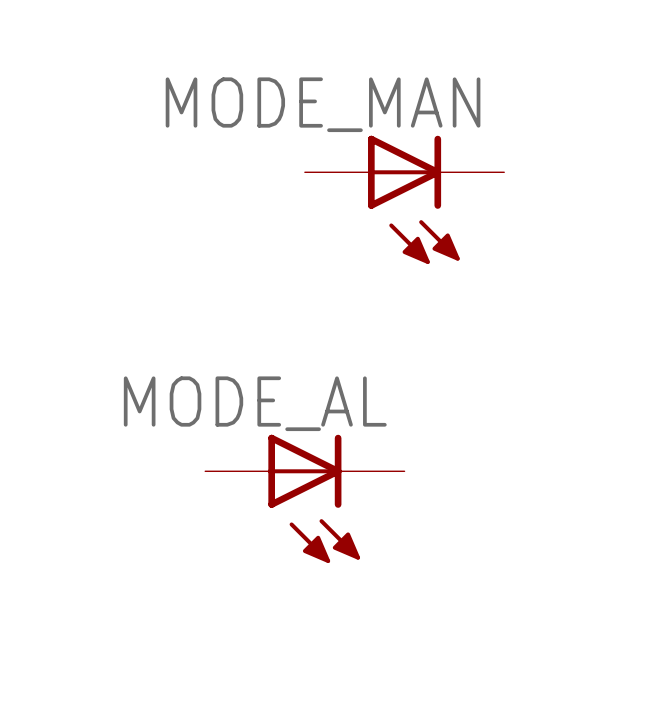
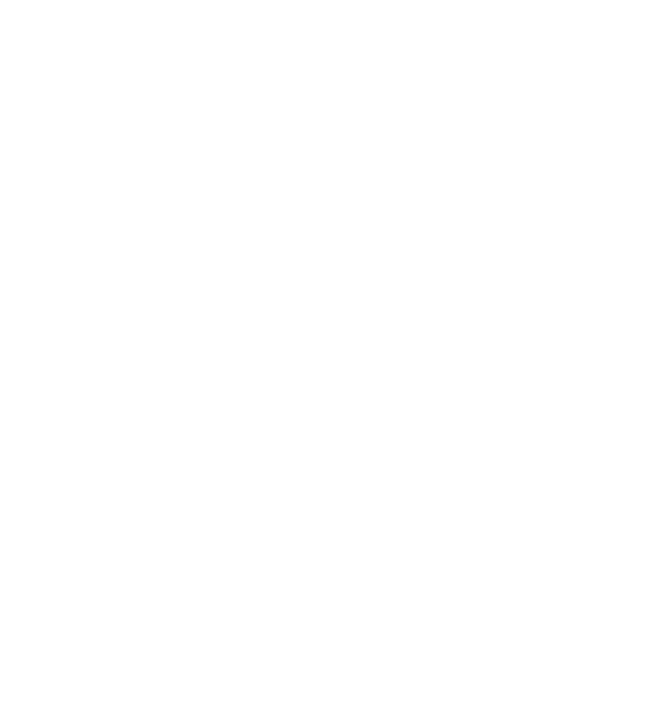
MODE_MAN: (404, 199) -> none
MODE_AL: (304, 498) -> none

